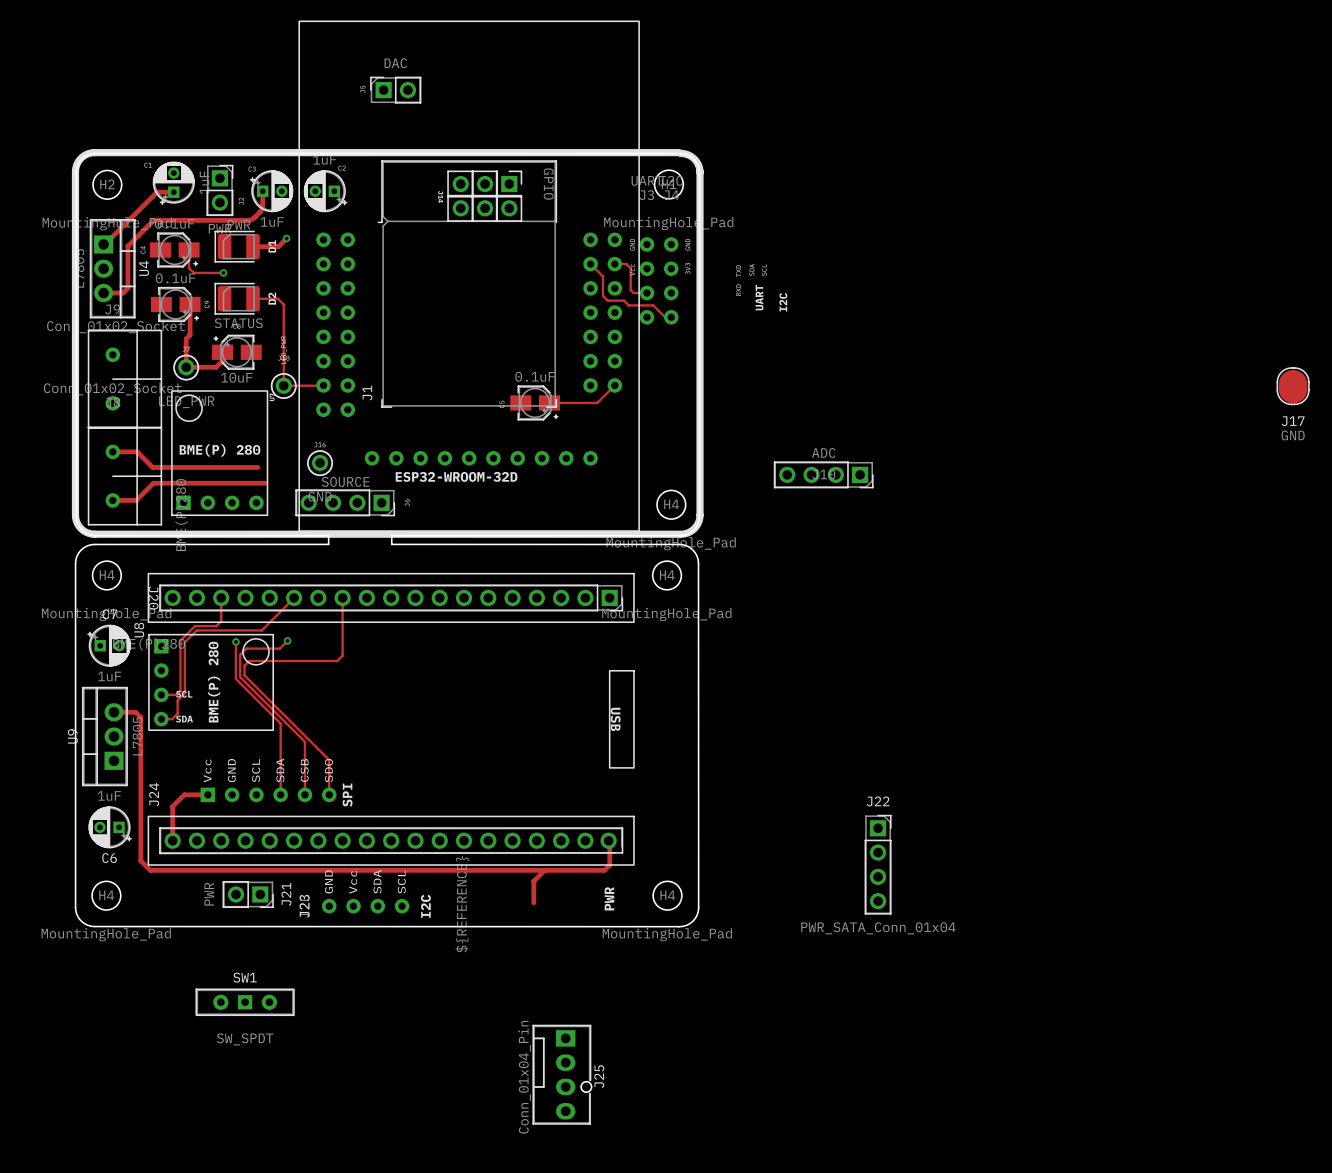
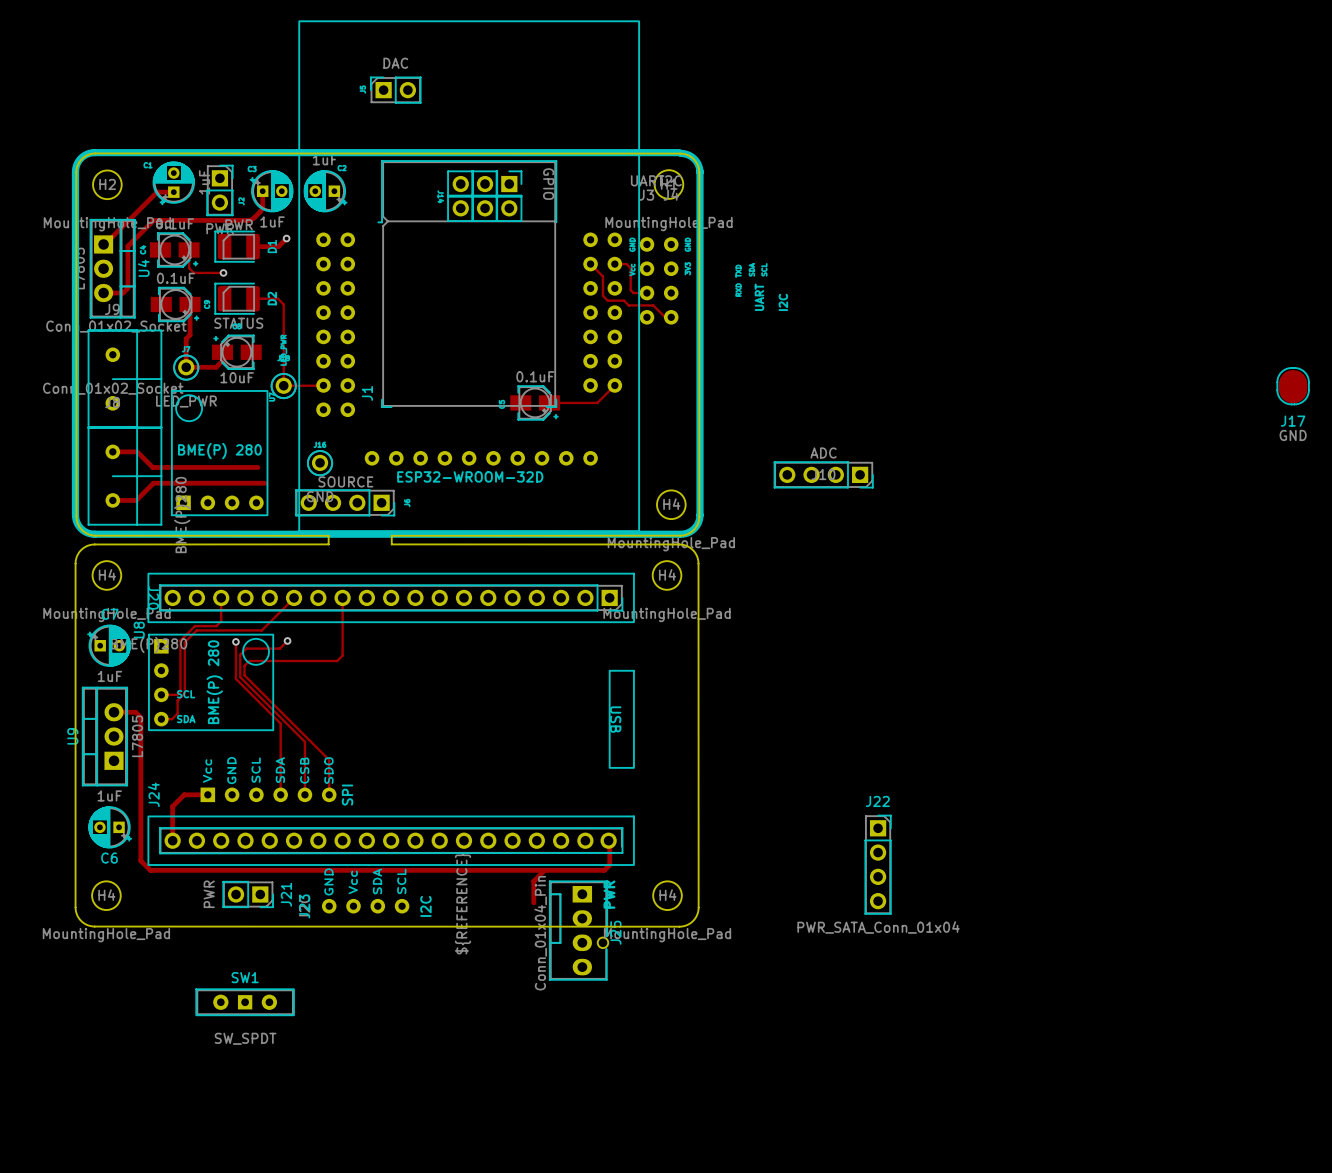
J25 position: (562, 1074) -> (578, 930)

